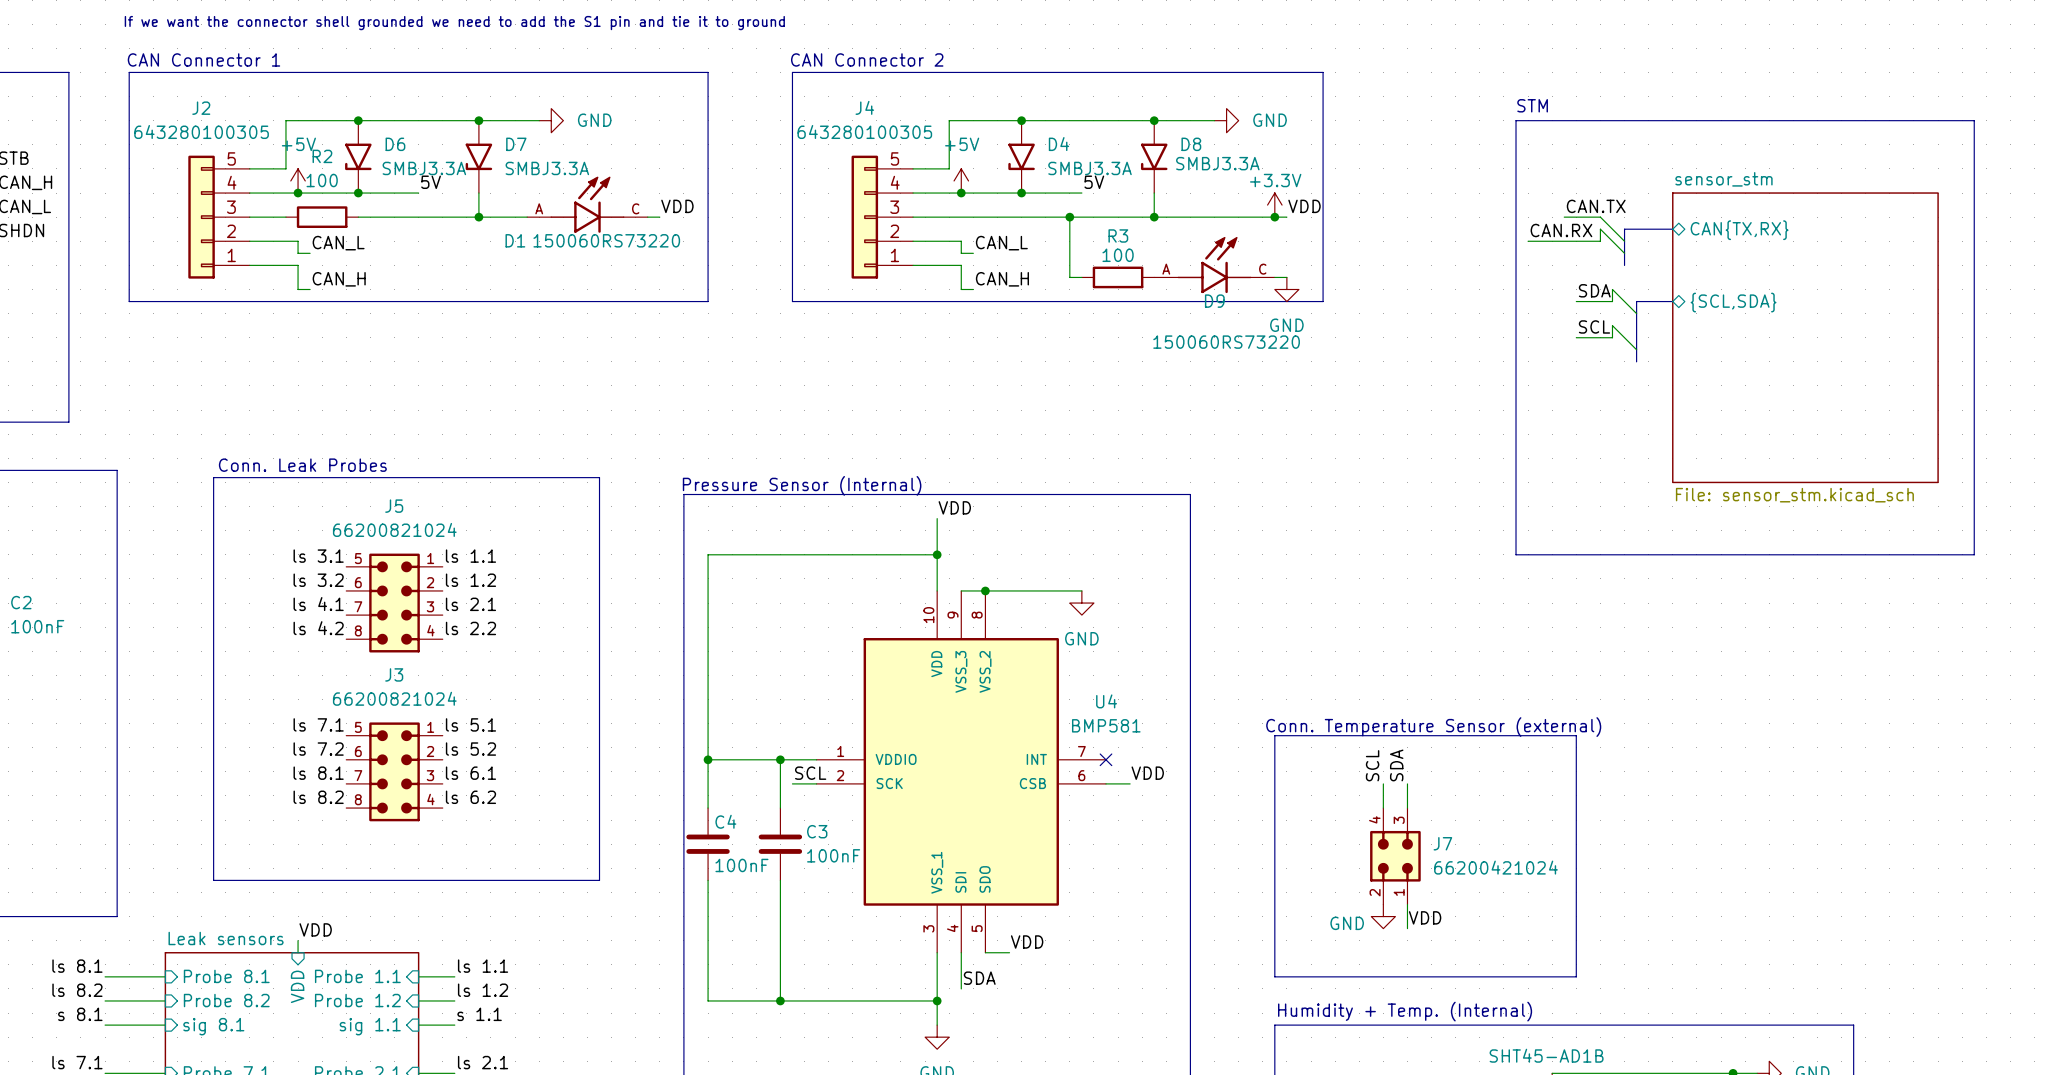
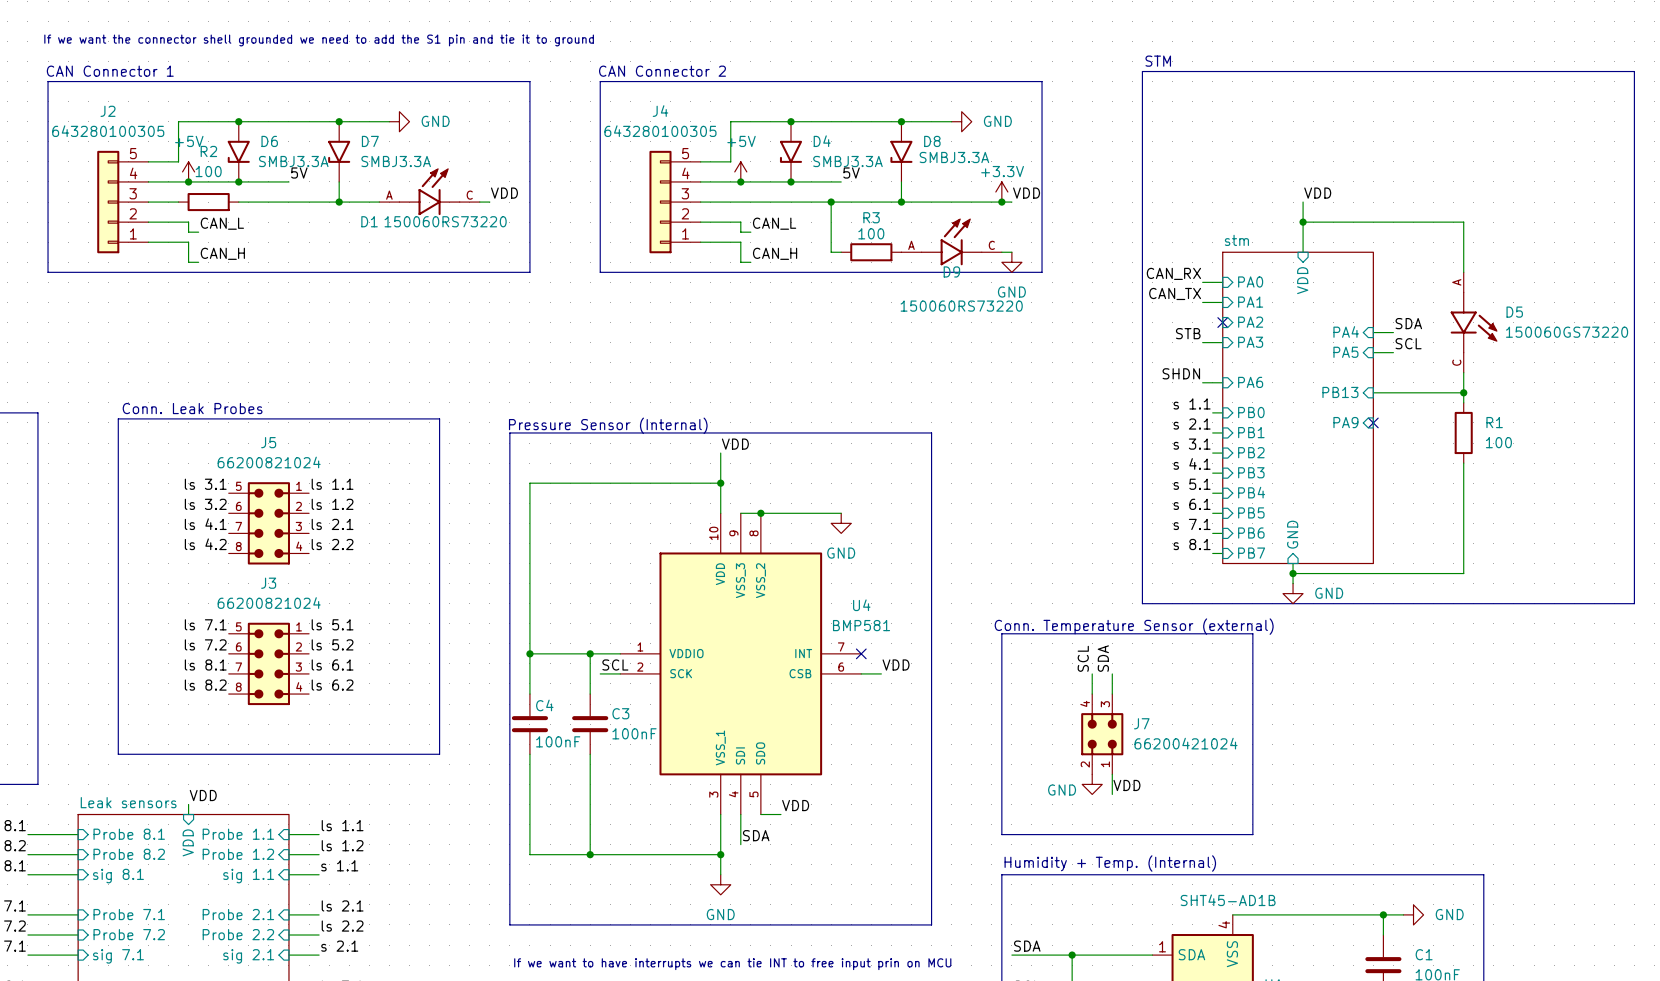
text position: STM (1532, 105) -> STM (1158, 61)
line: (1516, 120) (1974, 120) (1974, 554) (1516, 554) (1516, 120) -> (1142, 71) (1142, 603) (1634, 603) (1634, 71) (1142, 71)
label: CAN.TX (1596, 206) -> none
label: none -> VDD (1317, 193)
wire: (1564, 217) (1600, 217) (1624, 241) -> none
wire: none -> (1303, 202) (1303, 252)
bus: (1672, 229) (1624, 229) (1624, 265) -> none
label: CAN.RX (1561, 230) -> none
sheet pin: CAN{TX,RX} (1739, 230) -> none
wire: (1528, 241) (1600, 241) (1600, 229) (1624, 253) -> none
wire: none -> (1303, 222) (1463, 222) (1463, 272)
junction: none -> (1303, 222)
label position: SDA (1594, 290) -> SDA (1408, 323)
wire: (1576, 301) (1612, 301) (1612, 289) (1636, 313) -> none
bus: (1672, 301) (1636, 301) (1636, 361) -> none
sheet pin: {SCL,SDA} (1733, 302) -> none
label: none -> CAN_RX (1173, 273)
sheet pin: none -> VDD (1302, 280)
wire: none -> (1202, 282) (1222, 282)
sheet pin: none -> PA0 (1250, 282)
label position: SCL (1594, 326) -> SCL (1408, 343)
label: none -> CAN_TX (1175, 293)
wire: none -> (1202, 302) (1222, 302)
sheet pin: none -> PA1 (1250, 302)
wire: (1576, 337) (1612, 337) (1612, 325) (1636, 349) -> none
sheet sensor_stm: File: sensor_stm.kicad_sch (1805, 337) -> none
no-connect mark: none -> (1222, 322)
sheet pin: none -> PA2 (1250, 322)
D5: none -> 150060GS73220 (1474, 322)
sheet pin: none -> PA4 (1346, 331)
wire: none -> (1373, 332) (1393, 332)
label: none -> STB (1188, 333)
wire: none -> (1202, 342) (1222, 342)
sheet pin: none -> PA3 (1250, 342)
sheet pin: none -> PA5 (1345, 352)
wire: none -> (1373, 352) (1393, 352)
wire: none -> (1463, 372) (1463, 402)
label: none -> SHDN (1181, 373)
sheet pin: none -> PA6 (1250, 382)
wire: none -> (1202, 382) (1222, 382)
sheet pin: none -> PB13 (1340, 392)
wire: none -> (1373, 392) (1463, 392)
junction: none -> (1463, 392)
label: none -> s 1.1 (1192, 403)
sheet stm: none -> (1298, 407)
sheet pin: none -> PB0 (1251, 412)
wire: none -> (1212, 412) (1222, 412)
sheet pin: none -> PA9 (1345, 422)
no-connect mark: none -> (1373, 422)
label: none -> s 2.1 (1192, 424)
wire: none -> (1212, 432) (1222, 432)
sheet pin: none -> PB1 (1251, 432)
R1: none -> 100 (1463, 432)
label: none -> s 3.1 (1192, 444)
wire: none -> (1212, 453) (1222, 453)
sheet pin: none -> PB2 (1251, 452)
wire: none -> (1463, 463) (1463, 573) (1293, 573)
label: none -> s 4.1 (1192, 463)
wire: none -> (1212, 473) (1222, 473)
sheet pin: none -> PB3 (1251, 472)
label: none -> s 5.1 (1192, 484)
wire: none -> (1212, 493) (1222, 493)
sheet pin: none -> PB4 (1251, 492)
label: none -> s 6.1 (1192, 504)
wire: none -> (1212, 513) (1222, 513)
sheet pin: none -> PB5 (1251, 512)
label: none -> s 7.1 (1192, 524)
sheet pin: none -> PB6 (1251, 533)
wire: none -> (1212, 533) (1222, 533)
sheet pin: none -> GND (1292, 534)
label: none -> s 8.1 (1192, 544)
sheet pin: none -> PB7 (1251, 553)
wire: none -> (1212, 553) (1222, 553)
wire: none -> (1293, 563) (1293, 583)
junction: none -> (1293, 573)
power symbol: none -> GND (1293, 593)

